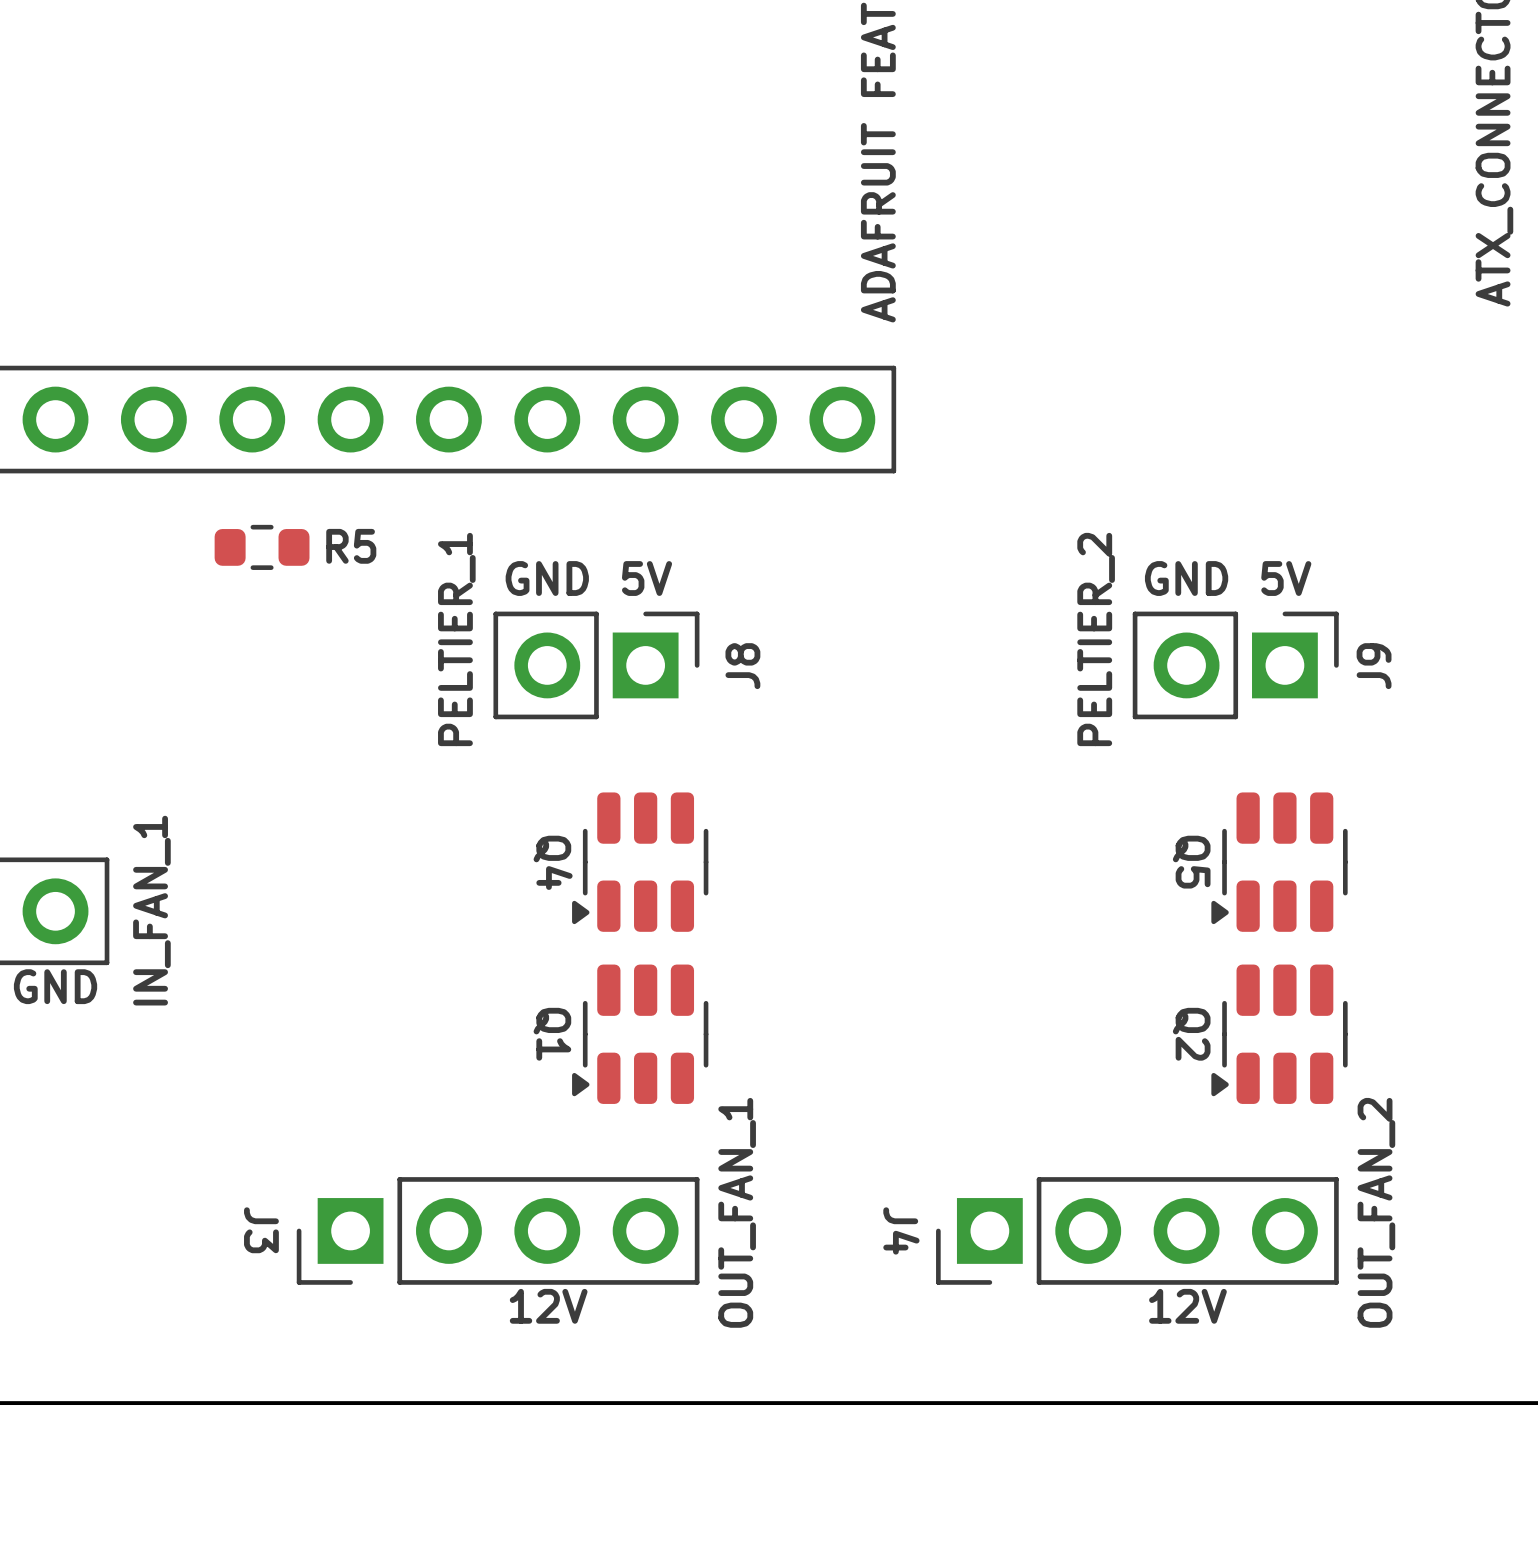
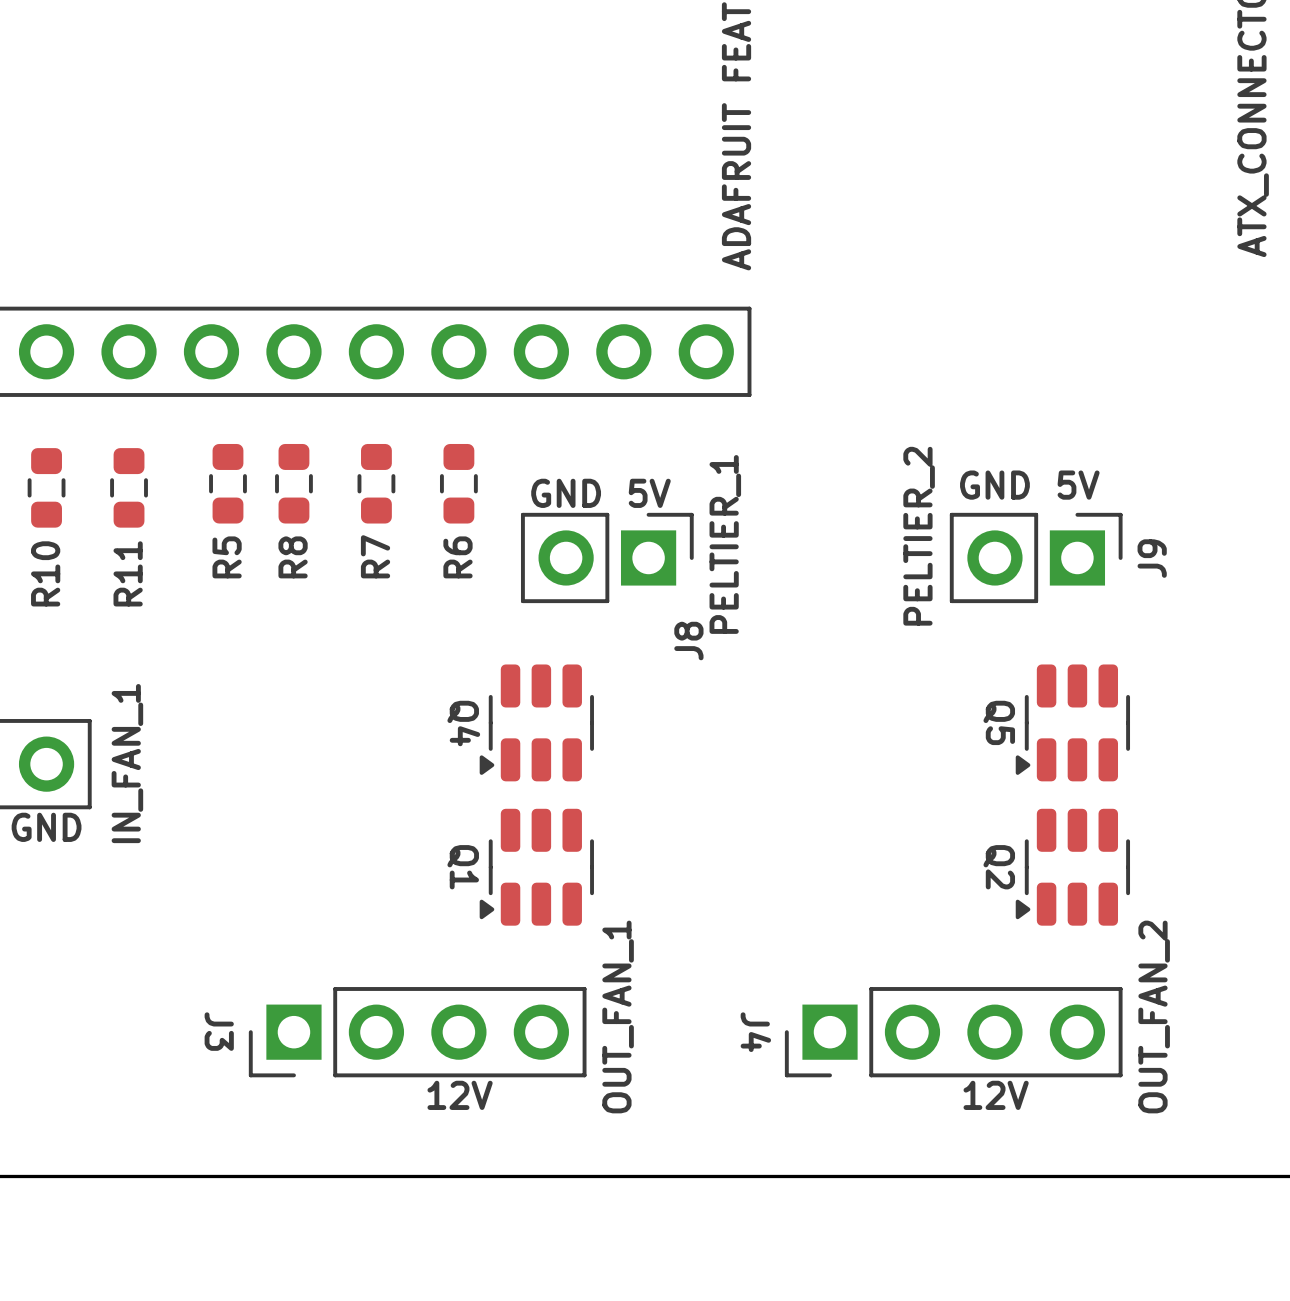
R5 rotation: 0° (262, 547) -> 90° clockwise (227, 483)
R8: none -> (293, 483)
R7: none -> (376, 483)
R6: none -> (458, 483)
text: GND (547, 578) -> none
text: 5V (647, 578) -> GND (566, 493)
R10: none -> (46, 487)
R11: none -> (129, 487)
text: none -> 5V (649, 493)
text position: PELTIER_1 (456, 639) -> PELTIER_1 (725, 544)
J8 position: (596, 665) -> (607, 557)
J8 name position: J8 (742, 666) -> J8 (688, 641)

